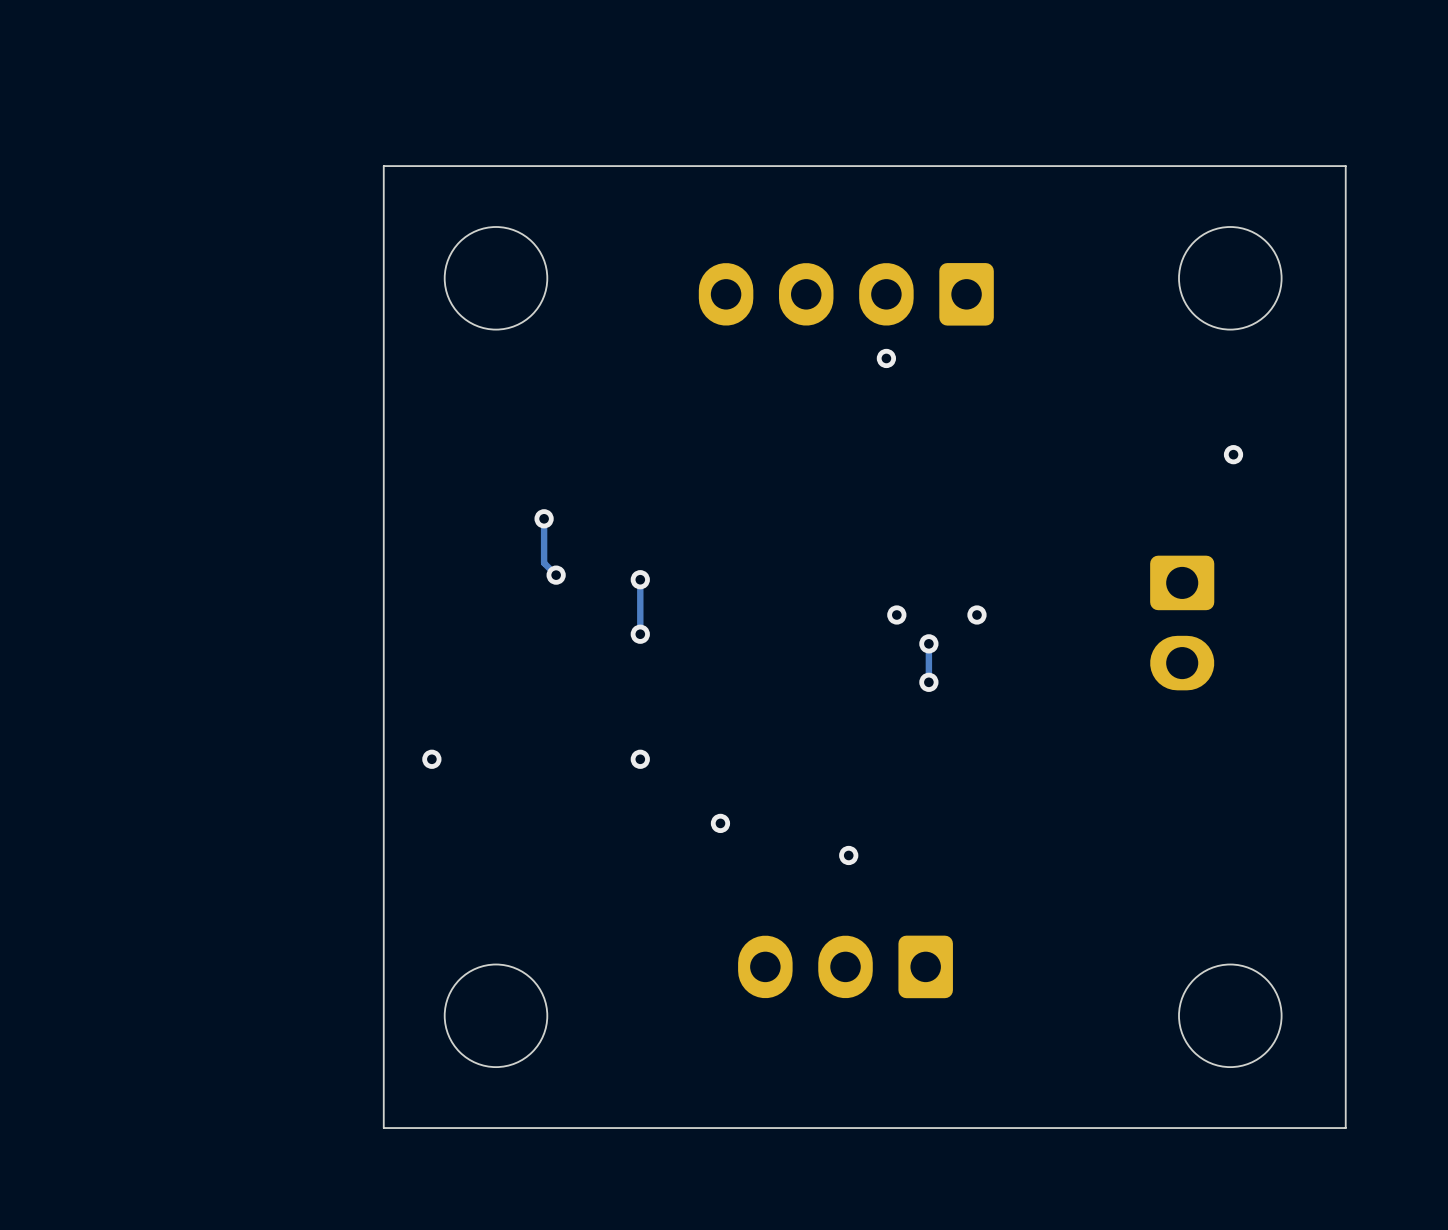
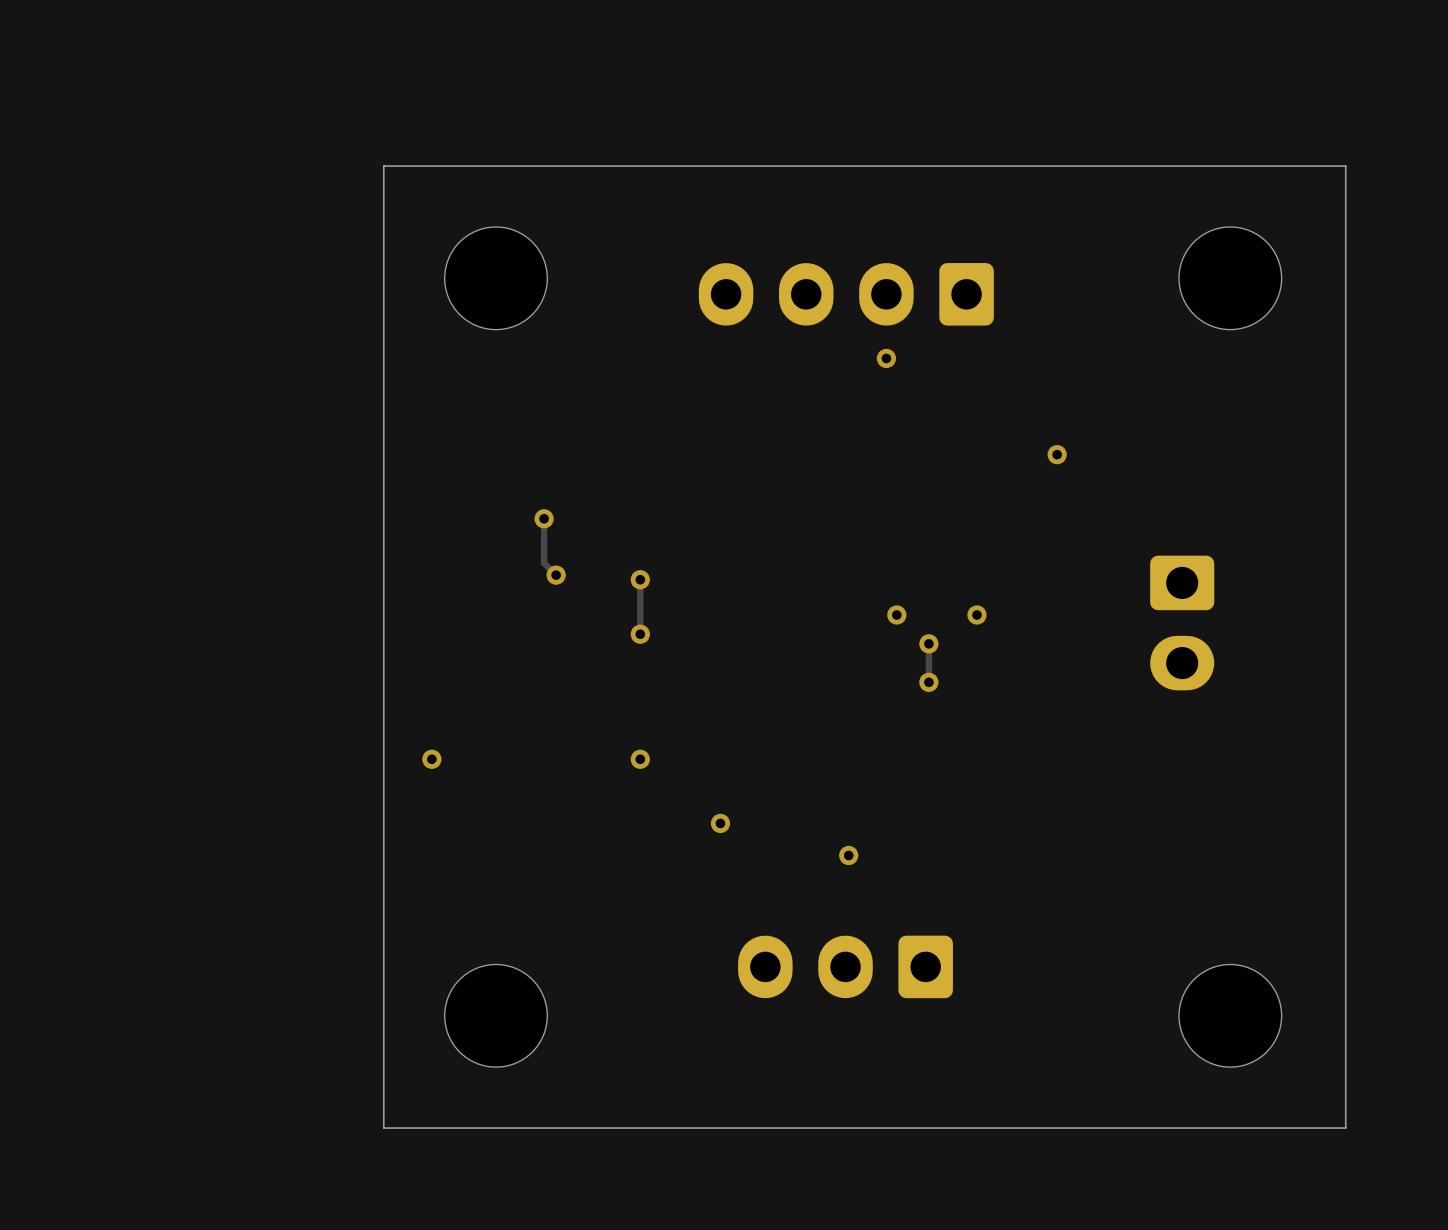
via position: (1233, 454) -> (1057, 454)

